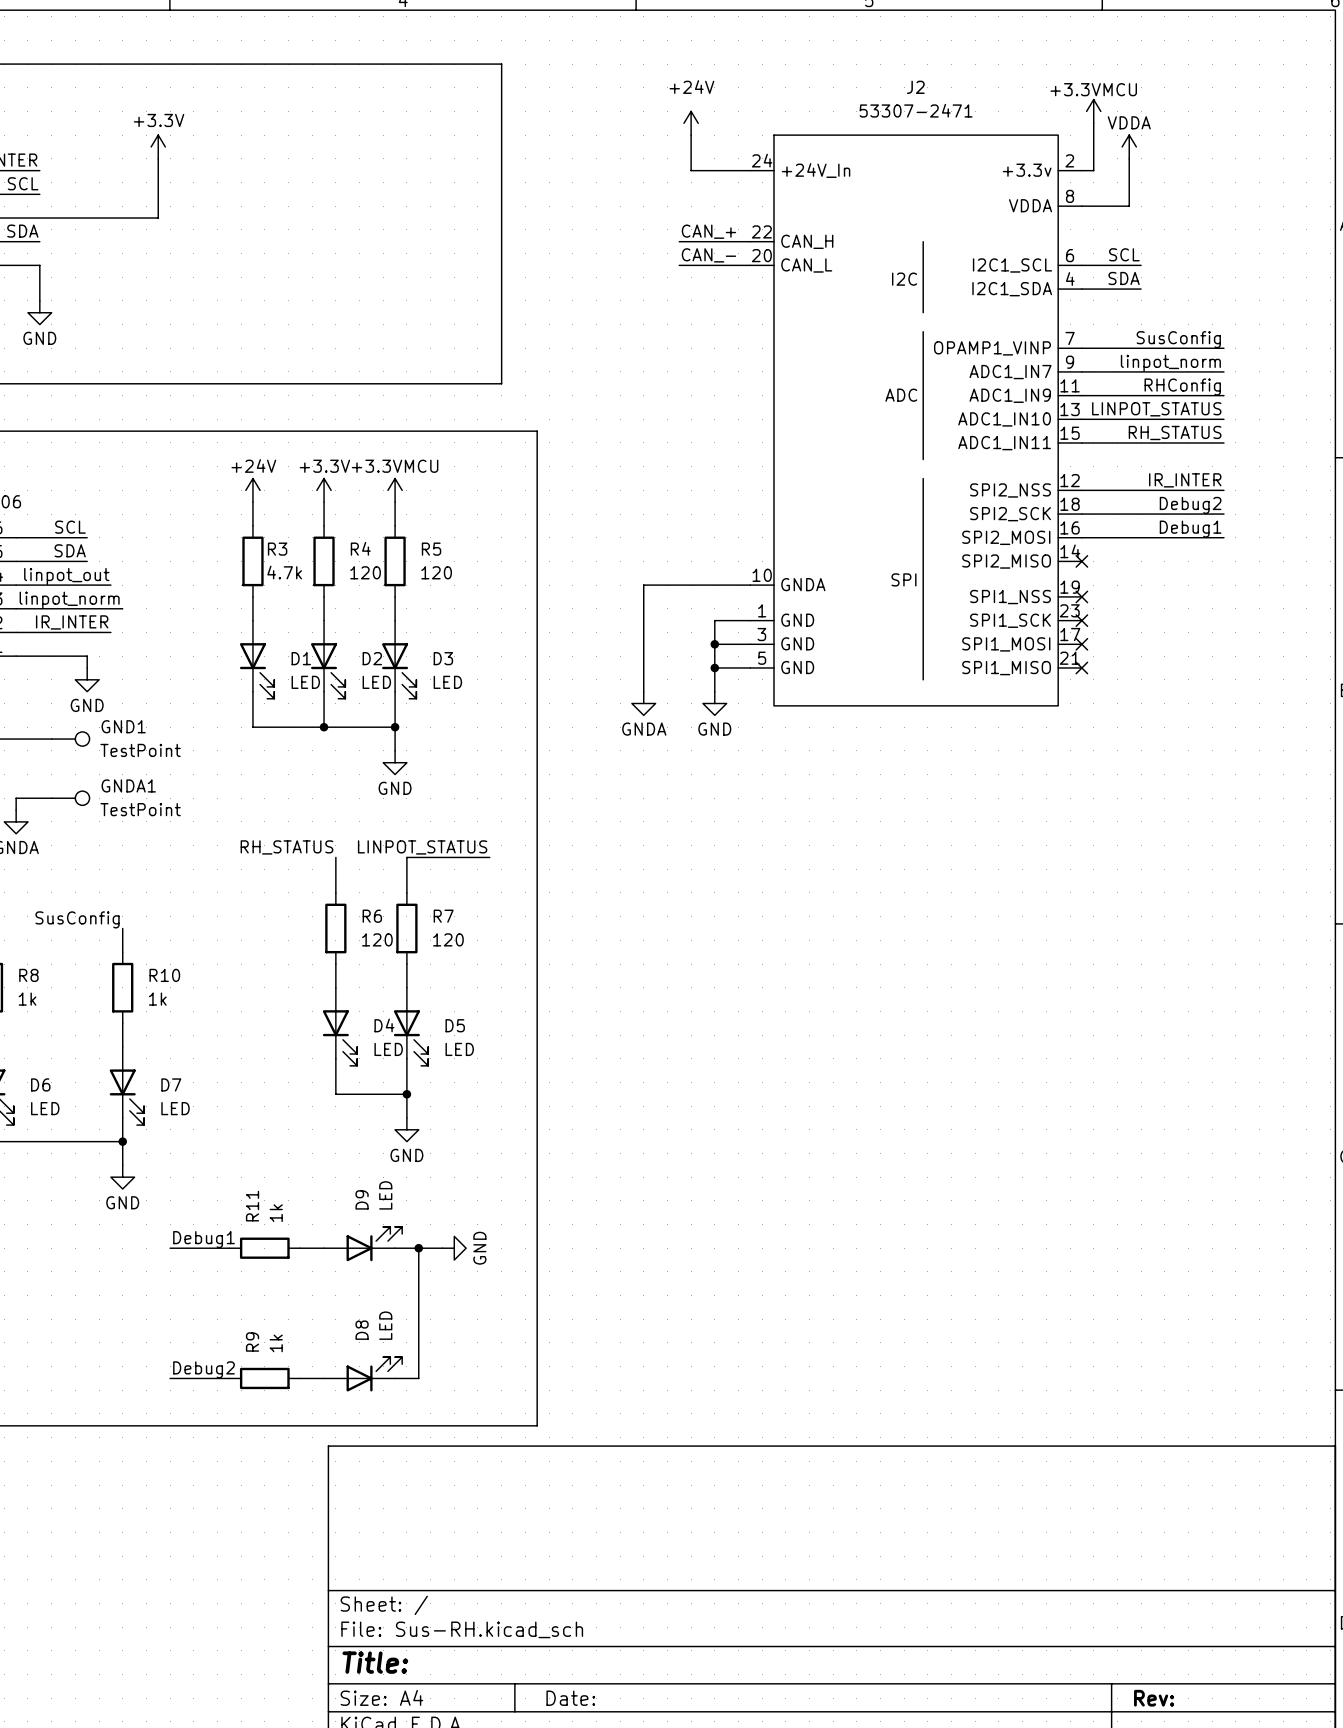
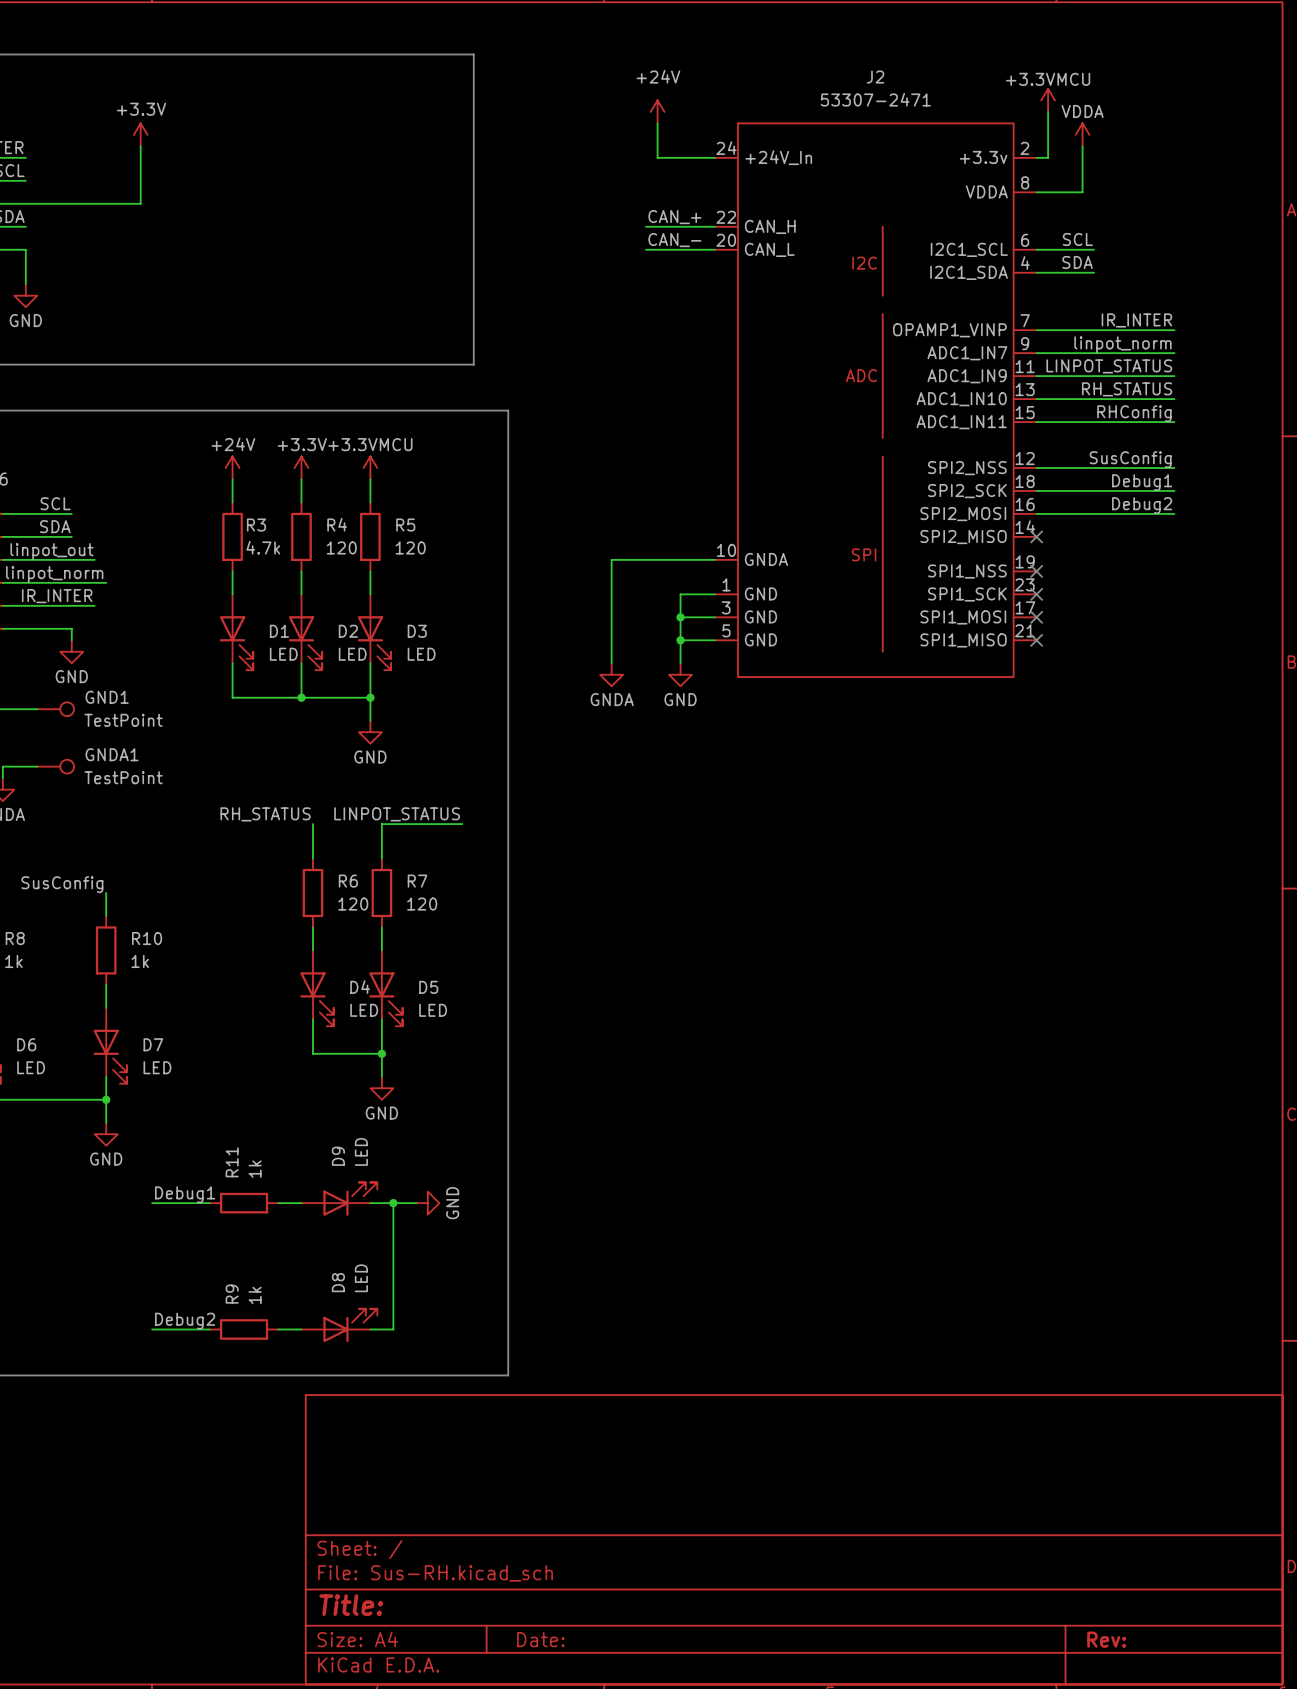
label: SusConfig (1178, 339) -> IR_INTER (1136, 320)
label: RHConfig (1182, 387) -> LINPOT_STATUS (1109, 366)
label: LINPOT_STATUS (1156, 409) -> RH_STATUS (1127, 389)
label: RH_STATUS (1175, 432) -> RHConfig (1134, 413)
label: IR_INTER (1185, 480) -> SusConfig (1130, 459)
label: Debug2 (1190, 505) -> Debug1 (1142, 482)
label: Debug1 (1190, 529) -> Debug2 (1142, 505)

